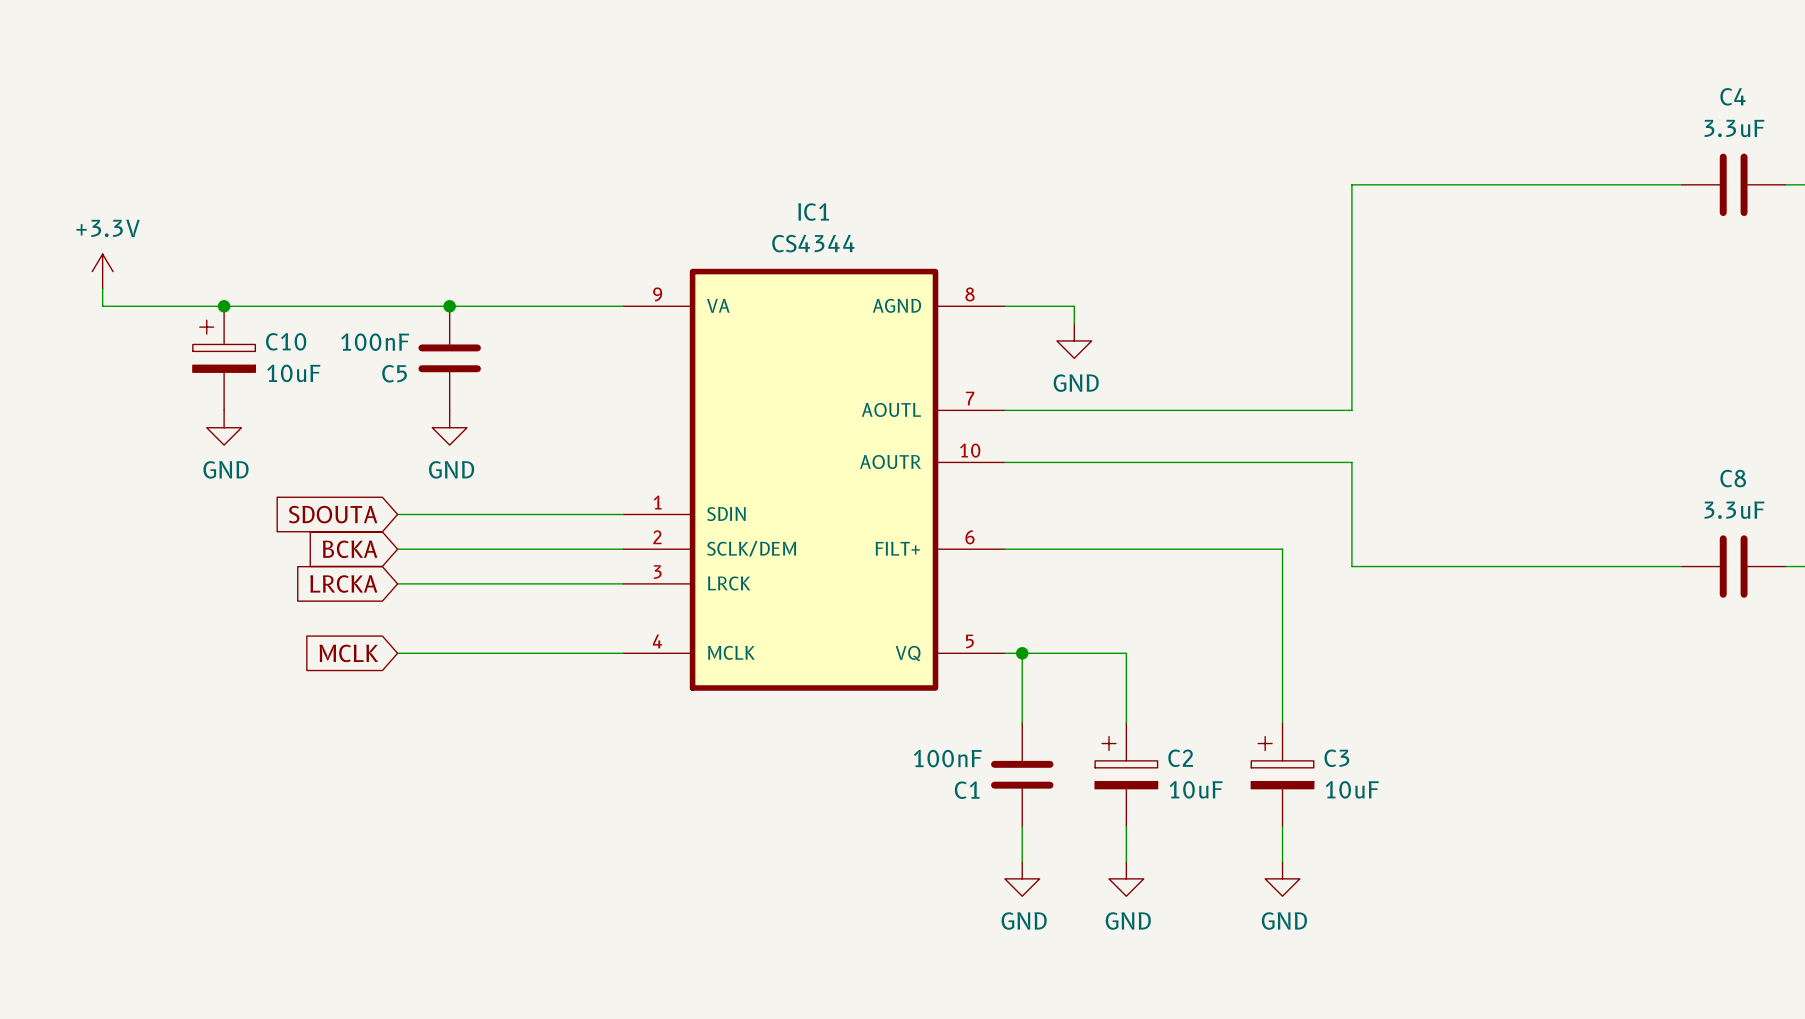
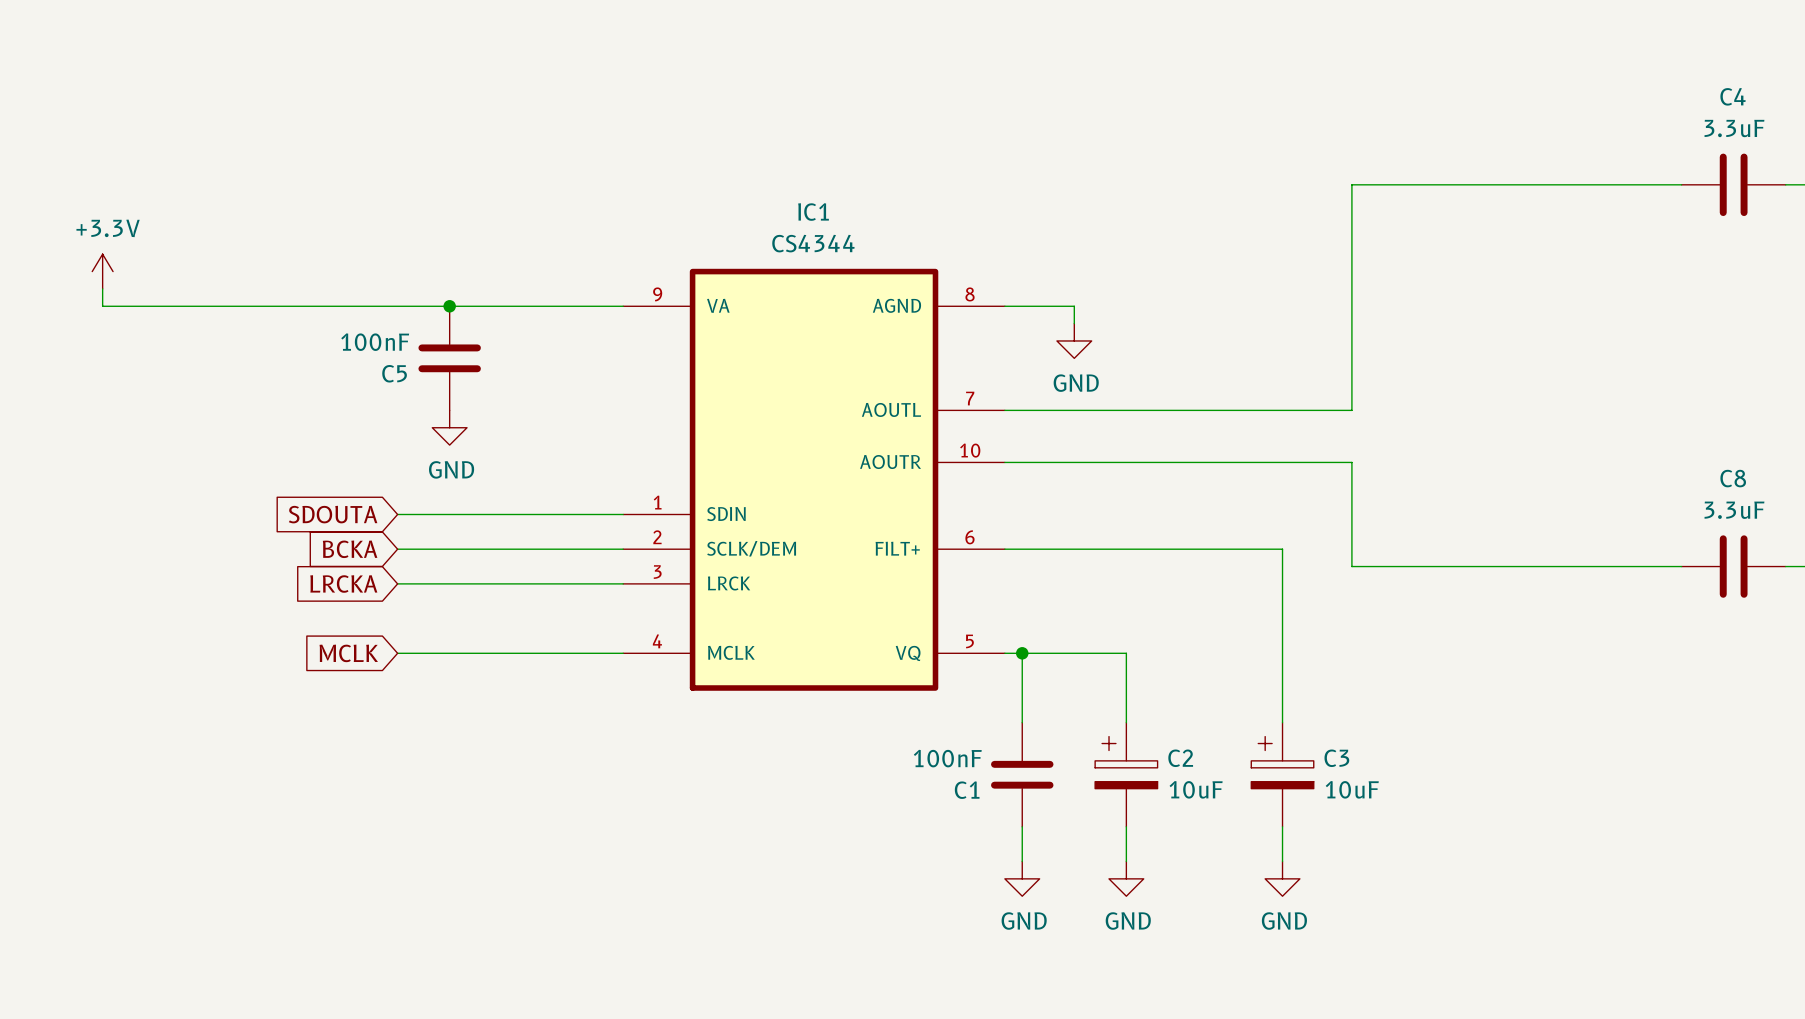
junction: (224, 306) -> none
C10: 10uF (224, 358) -> none
power symbol: GND (224, 427) -> none

